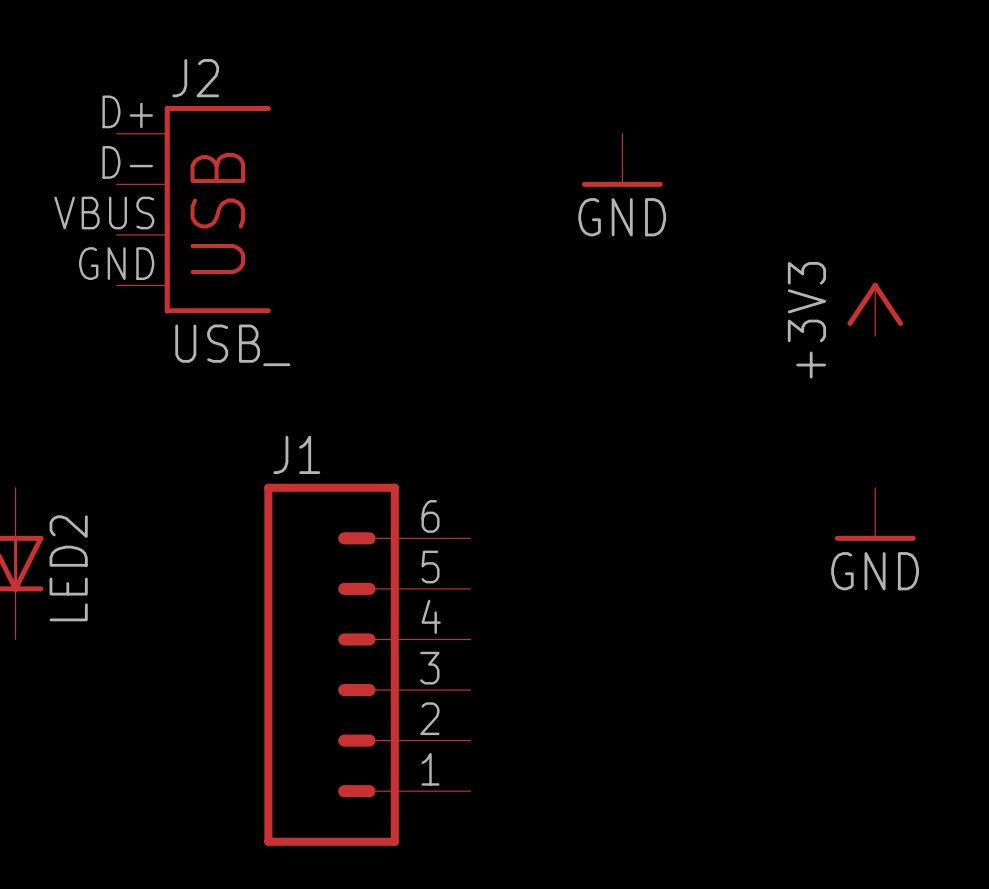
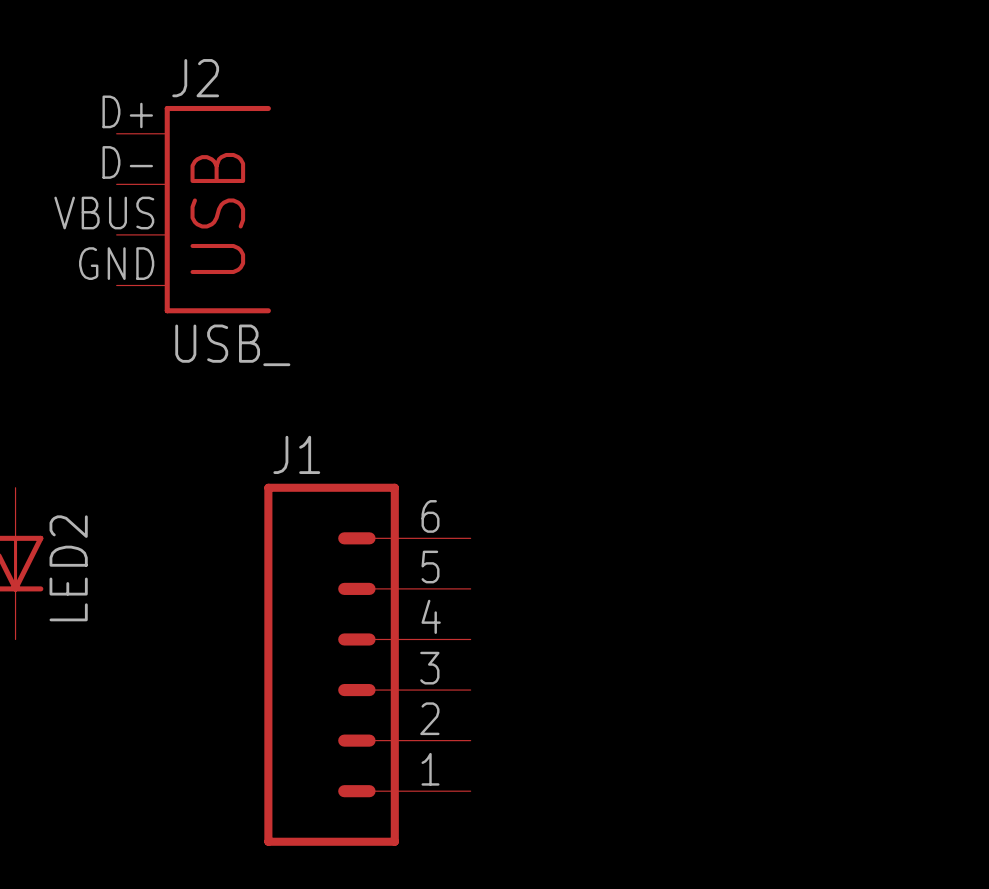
power symbol: GND (622, 160) -> none
power symbol: +3V3 (875, 309) -> none
power symbol: GND (875, 514) -> none

